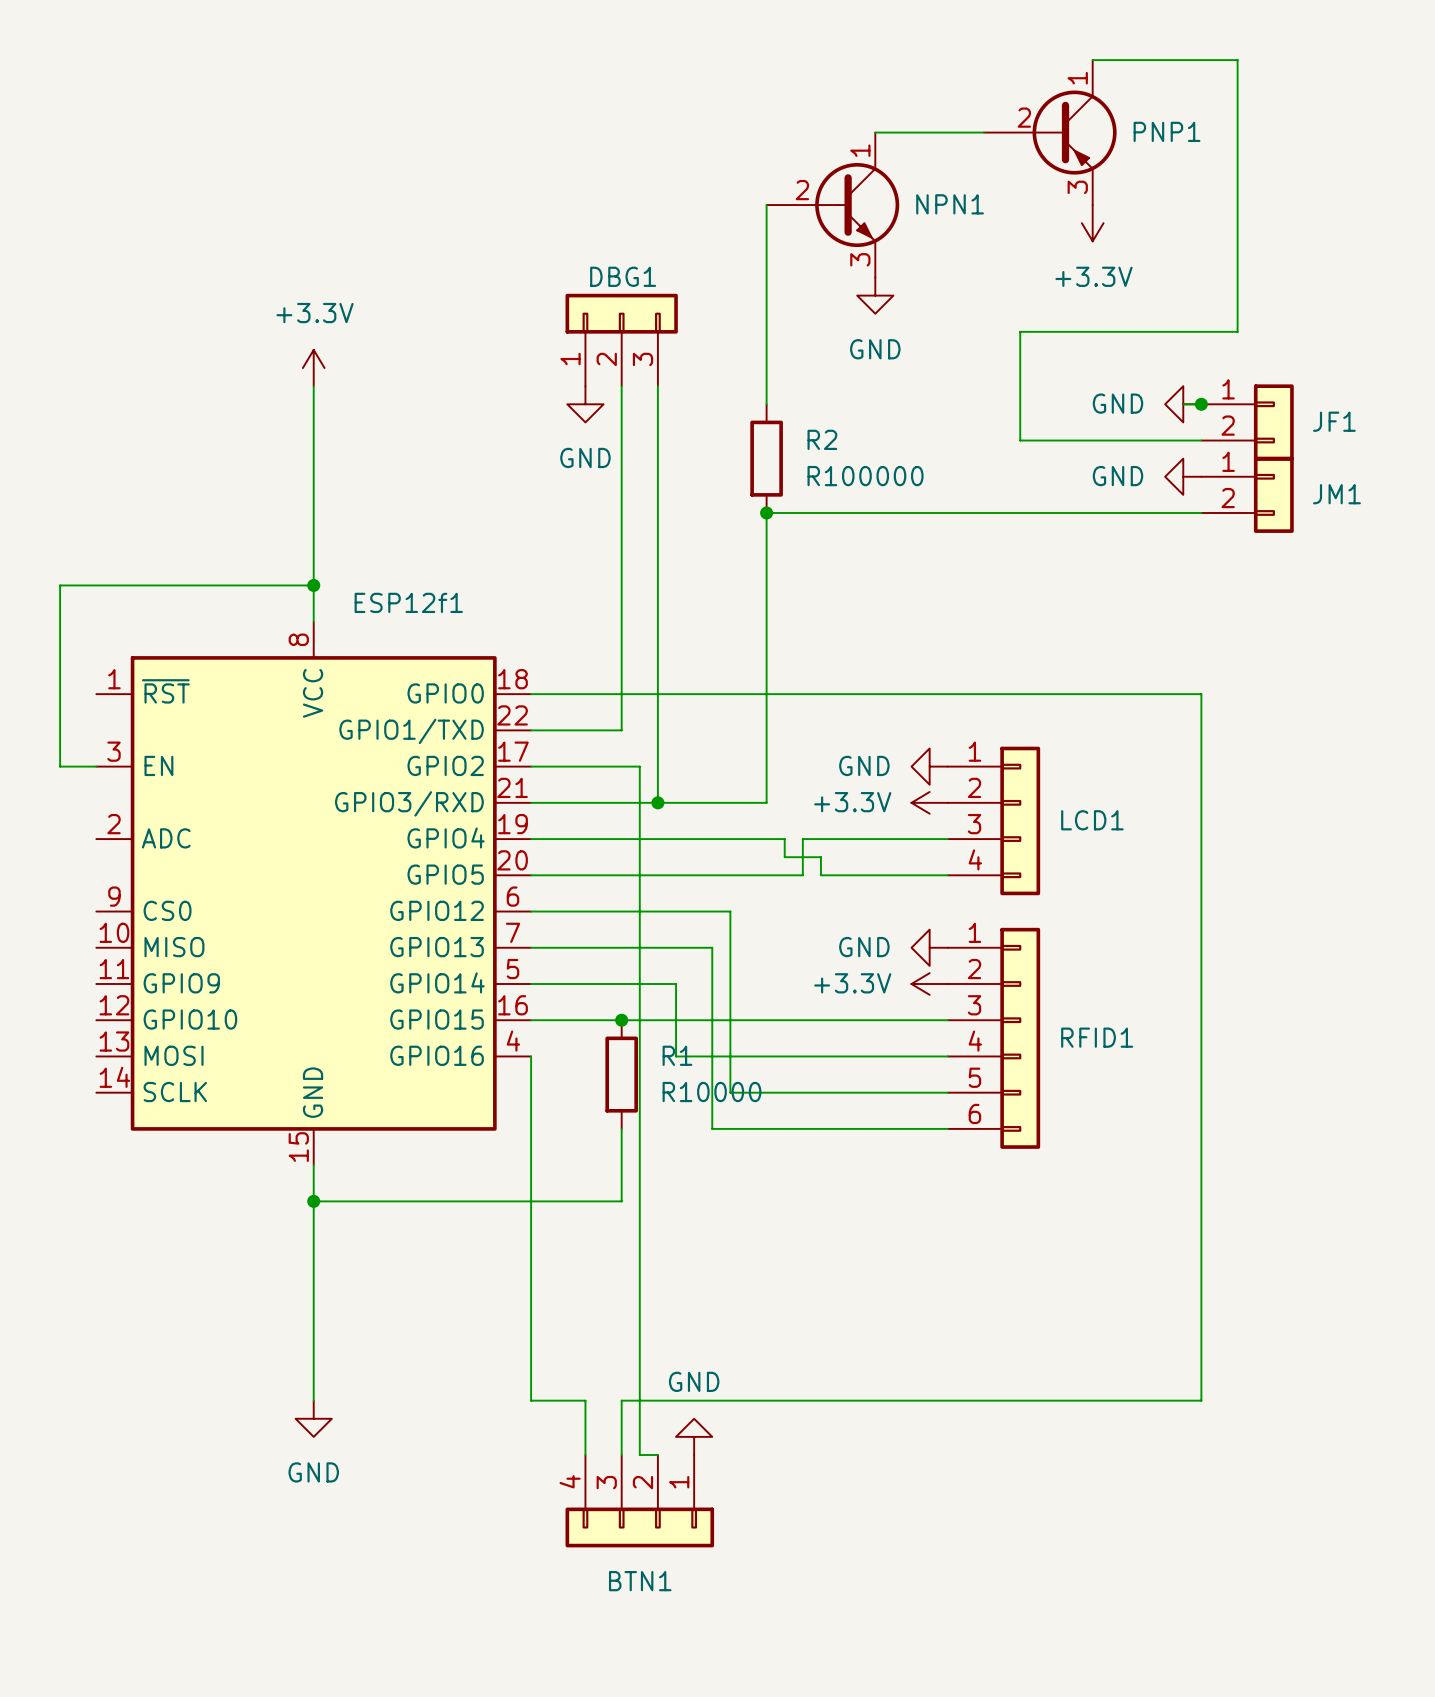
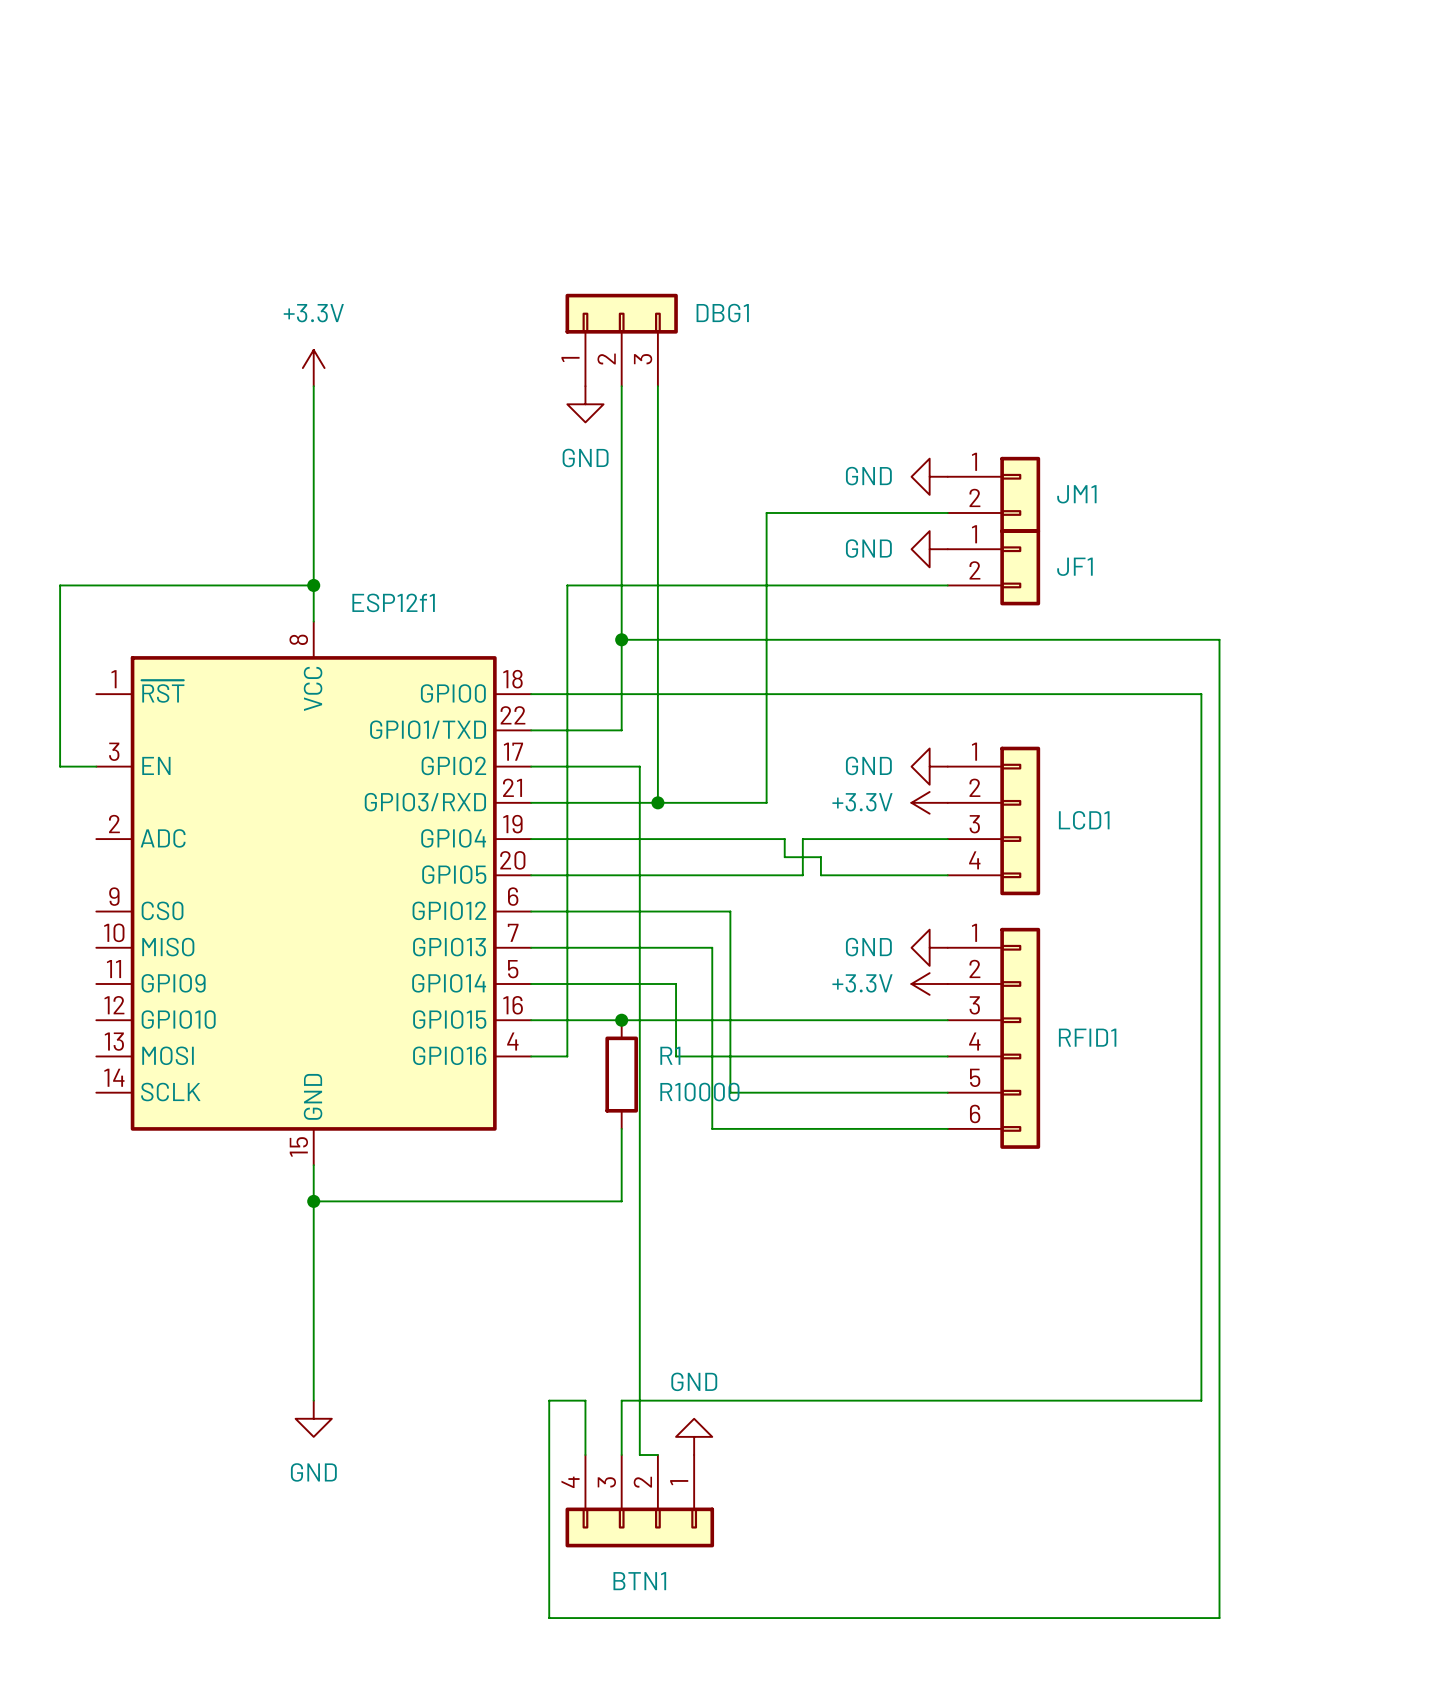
wire: (1092, 60) (1237, 60) (1237, 331) (1020, 331) (1020, 440) (1201, 440) -> none
wire: (875, 132) (984, 132) -> none
PNP1: (1050, 132) -> none
wire: (766, 205) (766, 404) -> none
NPN1: (832, 205) -> none
power symbol: +3.3V (1092, 223) -> none
DBG1 name position: DBG1 (623, 276) -> DBG1 (722, 313)
power symbol: GND (875, 295) -> none
wire: (1183, 404) (1201, 404) -> none
power symbol: GND (1183, 404) -> none
junction: (1201, 404) -> none
JF1 position: (1247, 422) -> (993, 567)
R2: R100000 (766, 458) -> none
power symbol: none -> GND (929, 476)
power symbol: GND (1183, 476) -> none
JM1 position: (1247, 494) -> (993, 494)
junction: (766, 512) -> none
wire: (947, 512) (1201, 512) -> none
power symbol: none -> GND (929, 549)
wire: none -> (947, 585) (567, 585) (567, 1056) (531, 1056)
junction: none -> (621, 639)
wire: (531, 1056) (531, 1400) (549, 1400) -> (621, 639) (1219, 639) (1219, 1618) (549, 1618) (549, 1400)

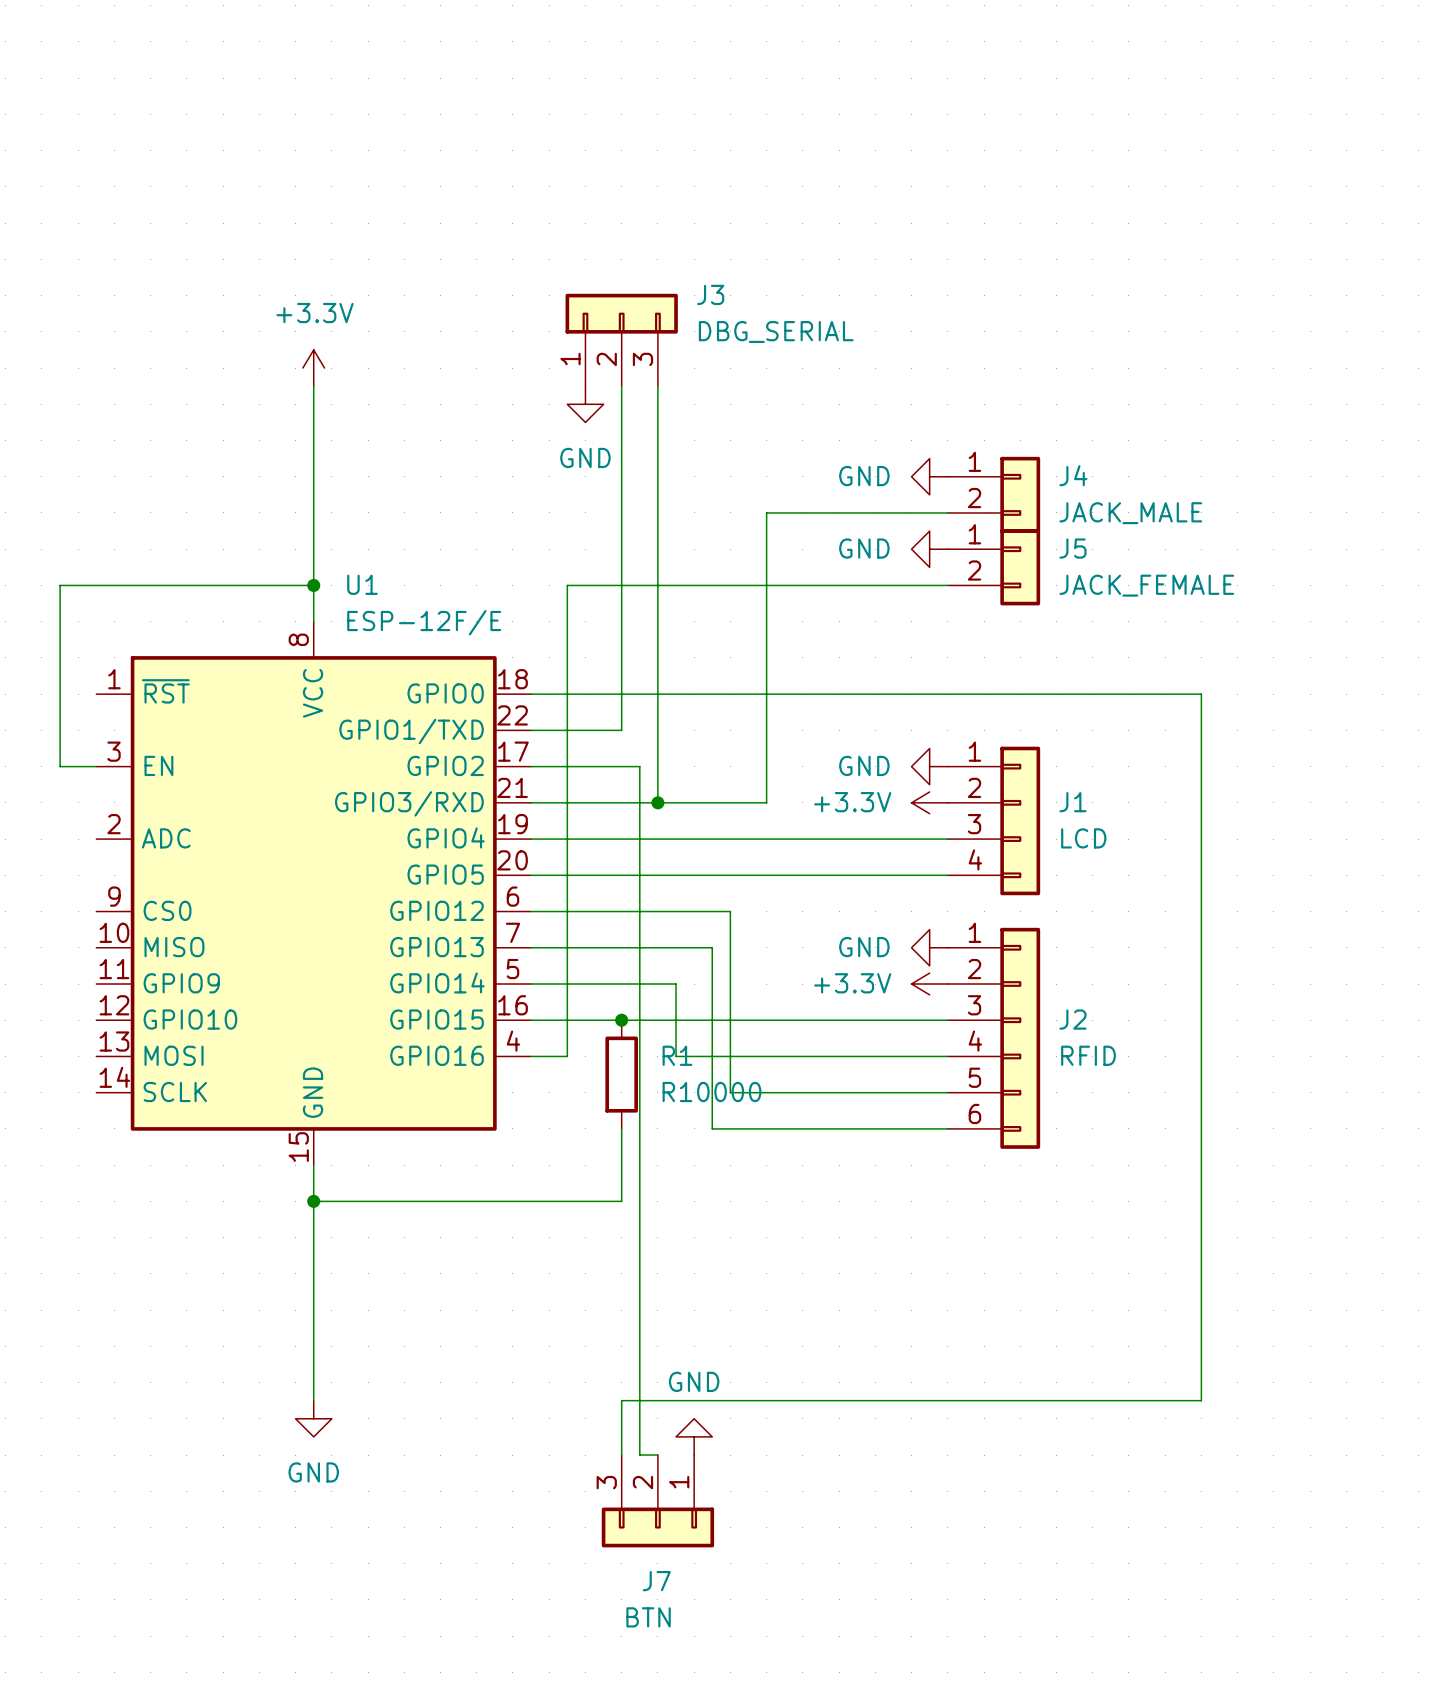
DBG1 name: DBG1 (722, 313) -> J3 (710, 294)
DBG1 value: none -> DBG_SERIAL (776, 332)
JM1 name: JM1 (1076, 494) -> J4 (1073, 475)
JM1 value: none -> JACK_MALE (1130, 513)
JF1 name: JF1 (1074, 566) -> J5 (1072, 548)
JF1 value: none -> JACK_FEMALE (1146, 585)
ESP12f1 name: ESP12f1 (393, 602) -> U1 (362, 584)
ESP12f1 value: none -> ESP-12F/E (424, 622)
wire: (621, 639) (1219, 639) (1219, 1618) (549, 1618) (549, 1400) (585, 1400) (585, 1455) -> none
junction: (621, 639) -> none
LCD1 name: LCD1 (1084, 820) -> J1 (1072, 802)
LCD1 value: none -> LCD (1083, 838)
wire: (784, 839) (784, 857) (820, 857) (820, 875) -> (802, 875) (820, 875)
wire: (802, 839) (802, 875) -> (802, 839) (784, 839)
RFID1 name: RFID1 (1087, 1037) -> J2 (1072, 1019)
RFID1 value: none -> RFID (1088, 1055)
BTN1: (639, 1501) -> none
J7: none -> BTN (657, 1501)

